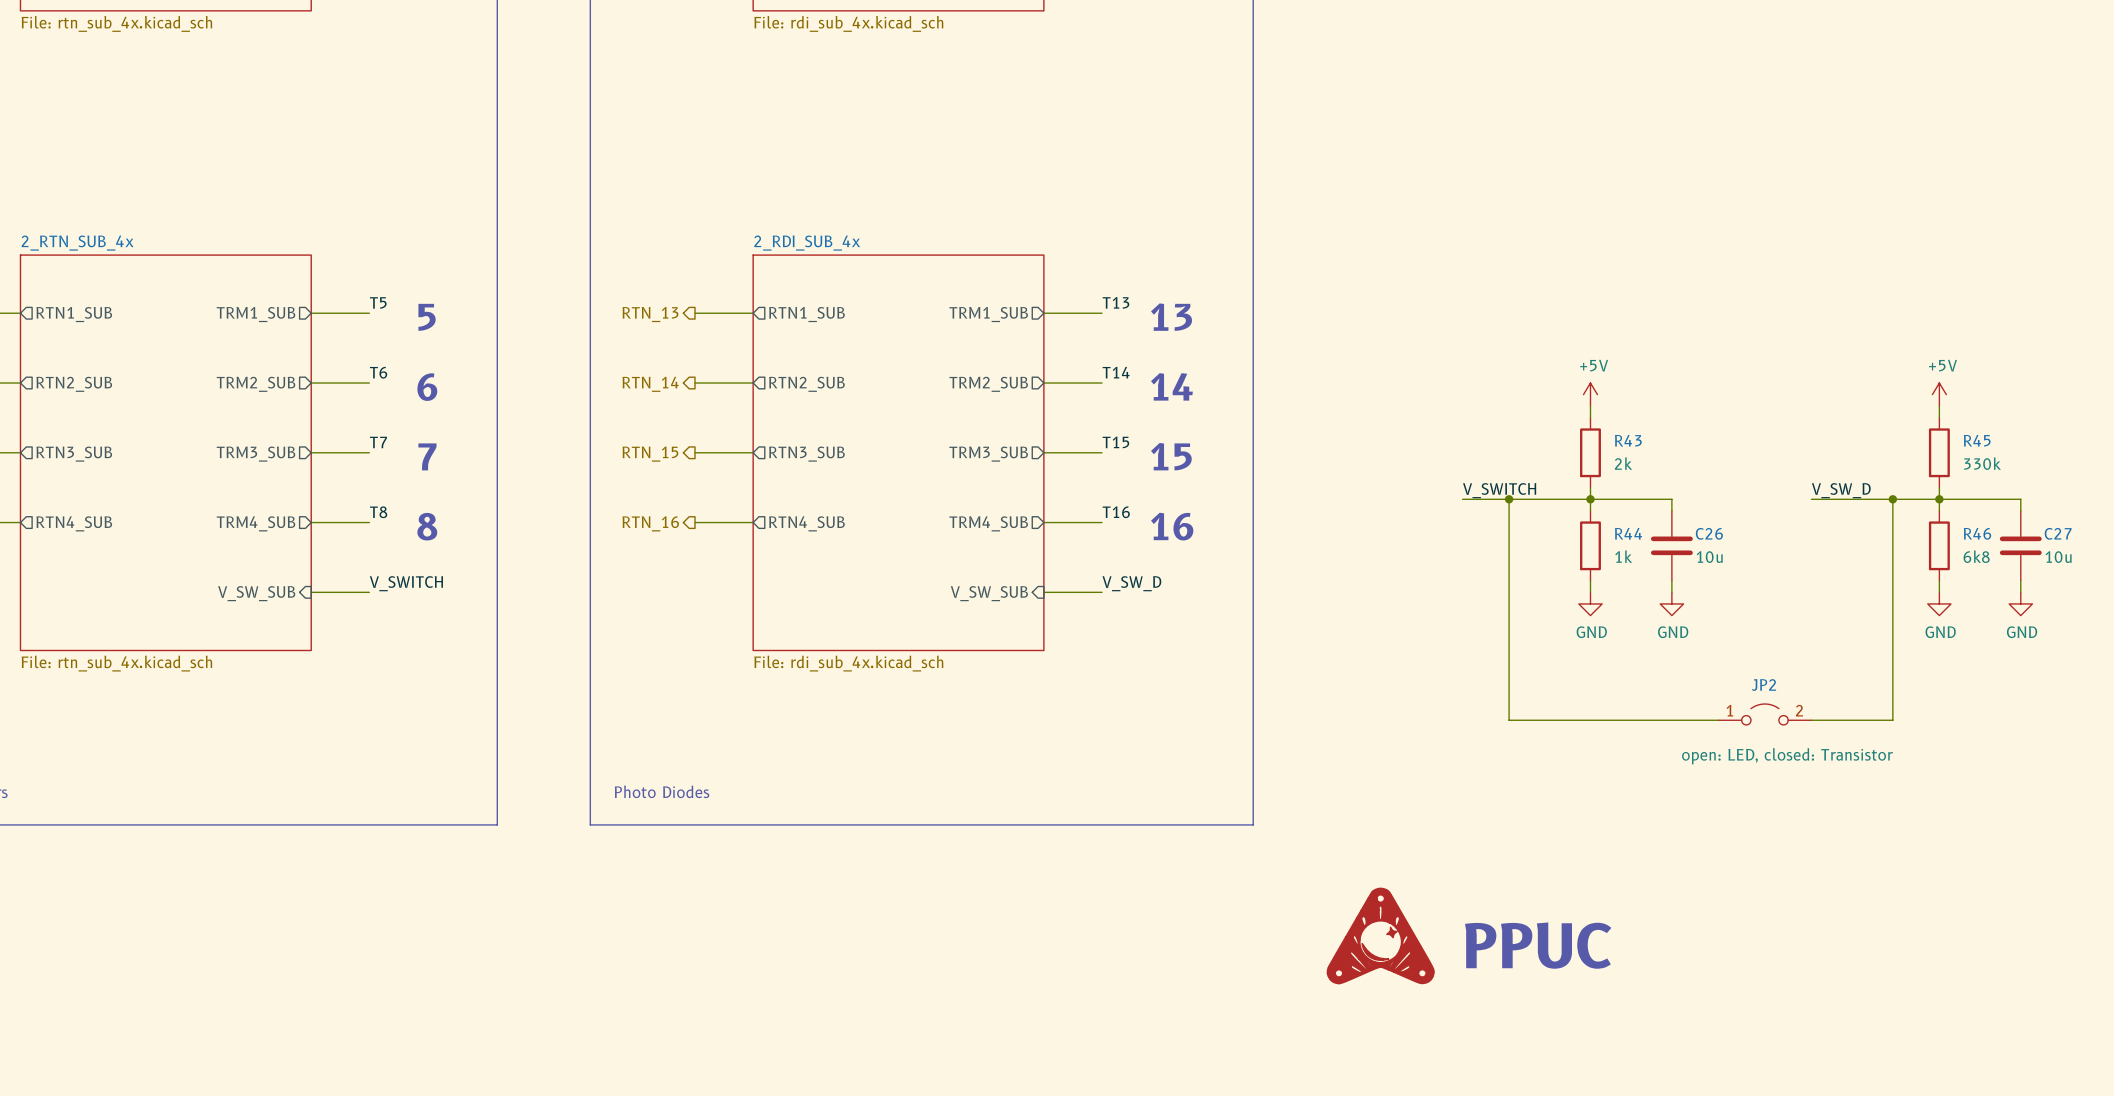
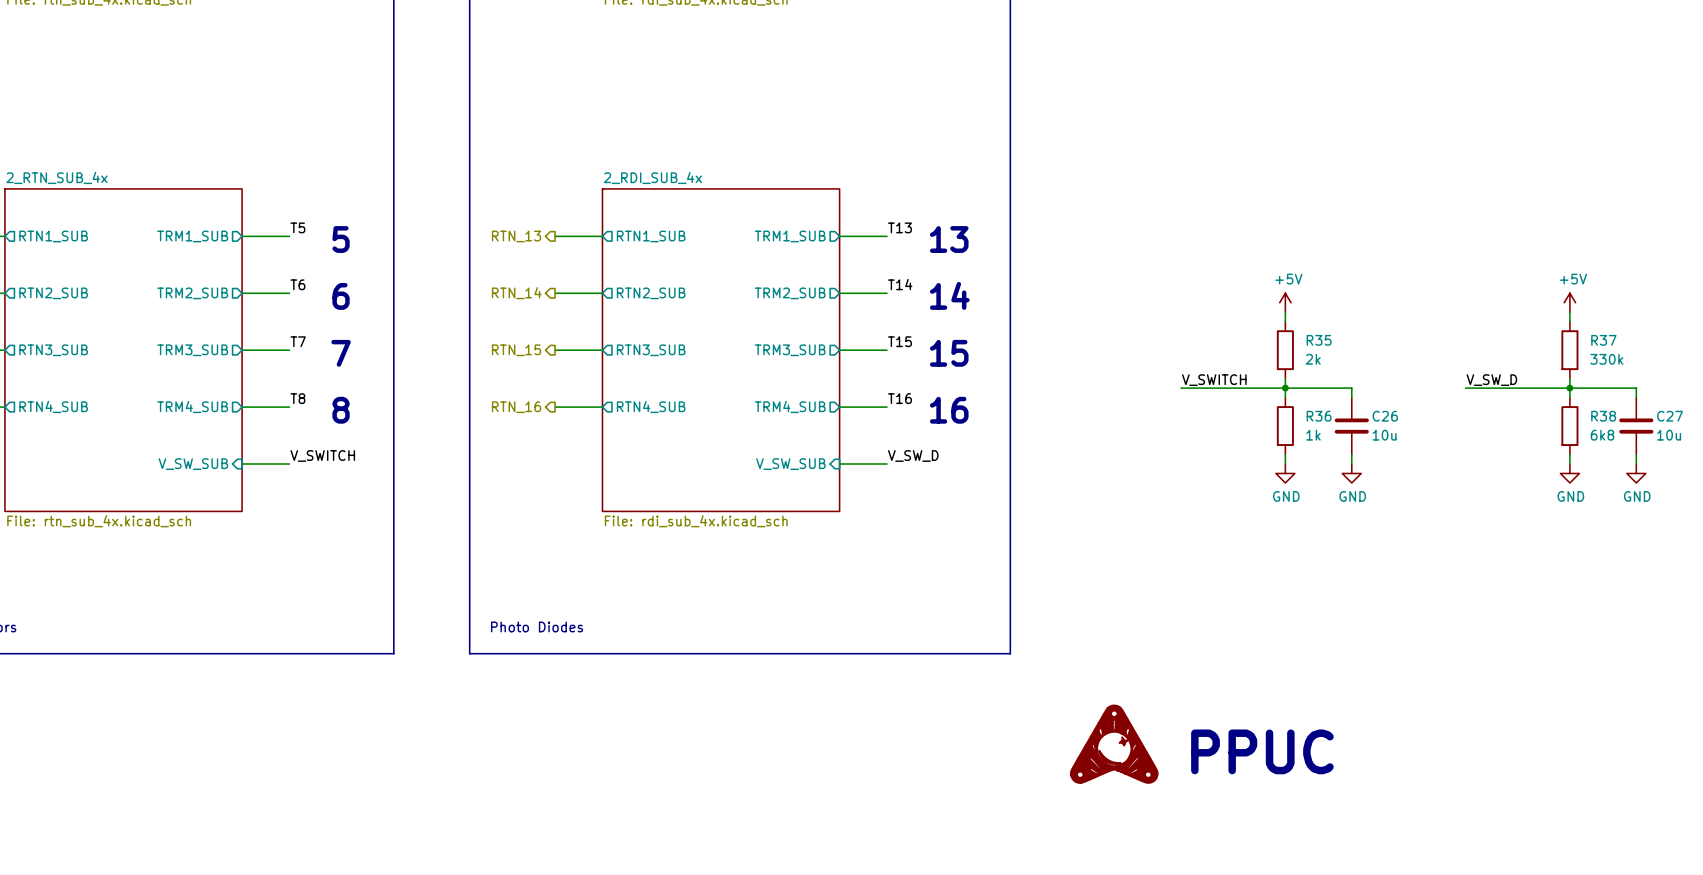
R43 name: R43 (1628, 440) -> R35 (1319, 340)
R45 name: R45 (1977, 440) -> R37 (1603, 340)
wire: (1509, 499) (1509, 720) (1718, 720) -> none
junction: (1509, 499) -> none
wire: (1892, 499) (1892, 720) (1811, 720) -> none
junction: (1892, 499) -> none
R44 name: R44 (1628, 533) -> R36 (1319, 416)
R46 name: R46 (1977, 533) -> R38 (1603, 416)
JP2: open: LED, closed: Transistor (1764, 714) -> none

